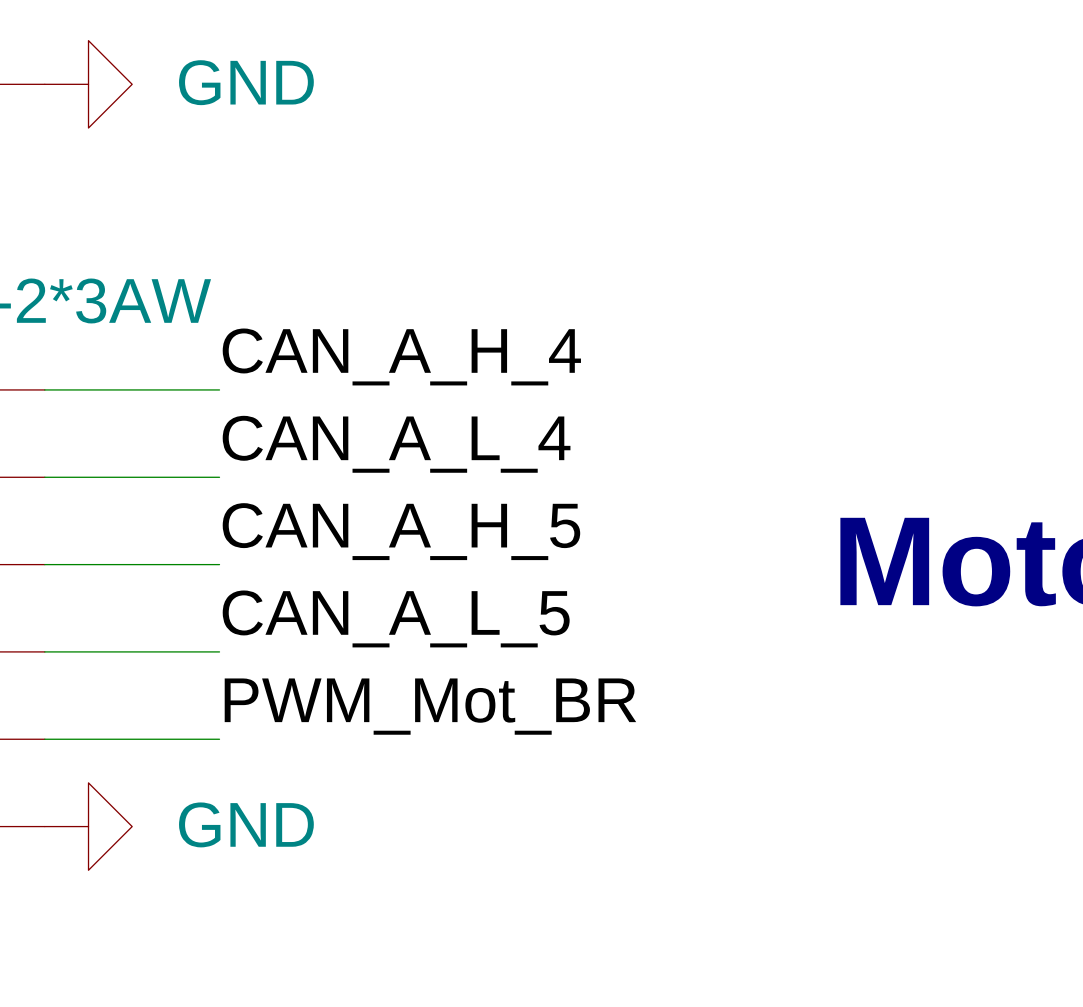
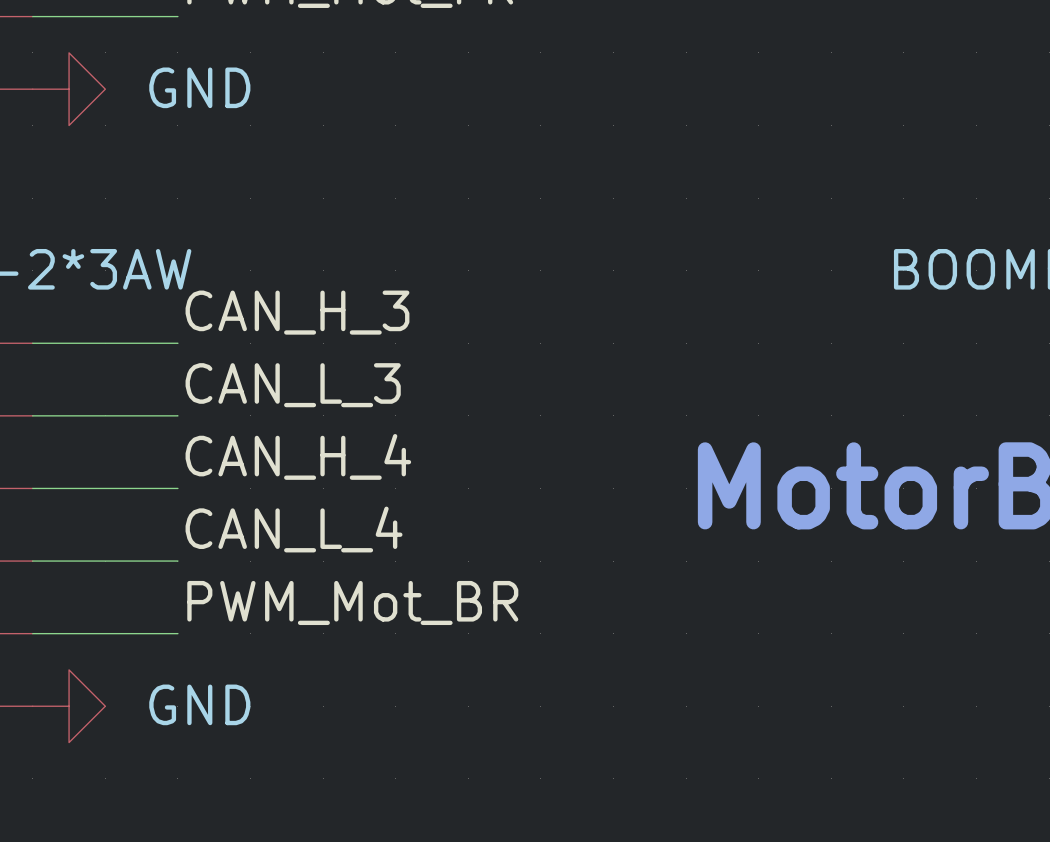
label: CAN_A_H_4 (401, 356) -> CAN_H_3 (297, 312)
label: CAN_A_L_4 (396, 444) -> CAN_L_3 (293, 385)
label: CAN_A_H_5 (401, 531) -> CAN_H_4 (298, 456)
label: CAN_A_L_5 (396, 618) -> CAN_L_4 (294, 529)

